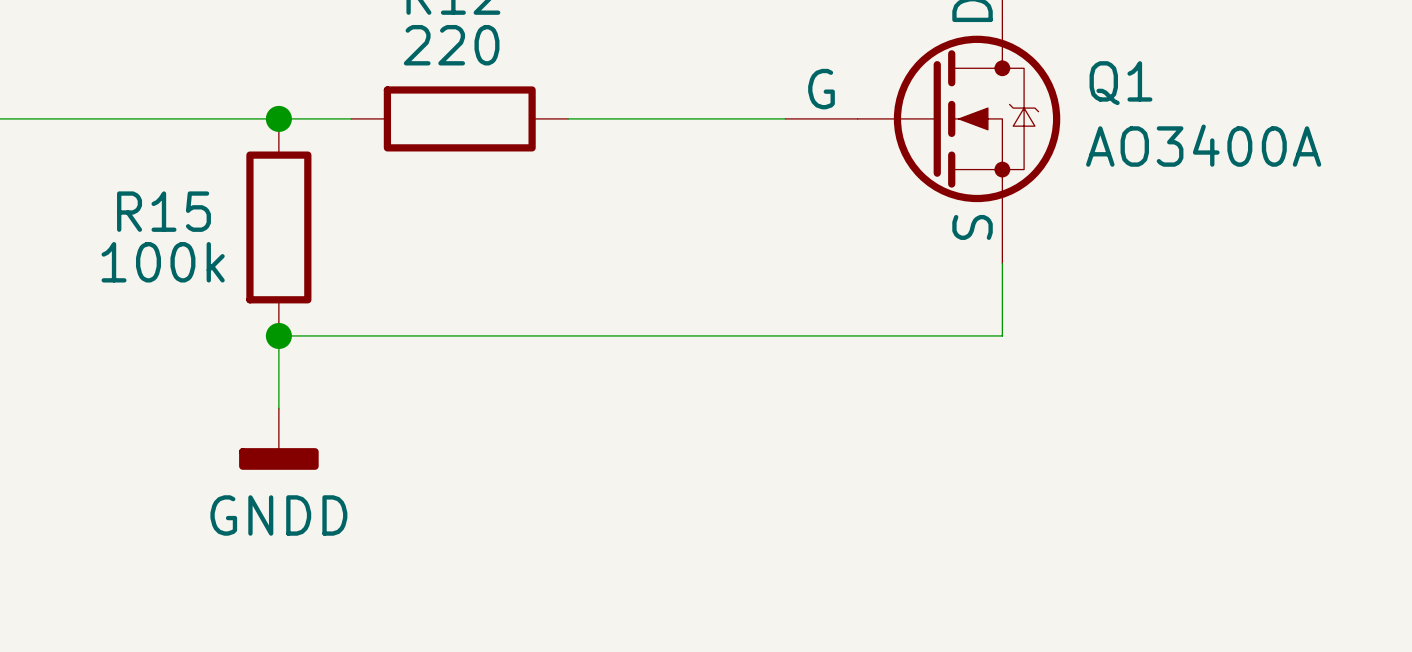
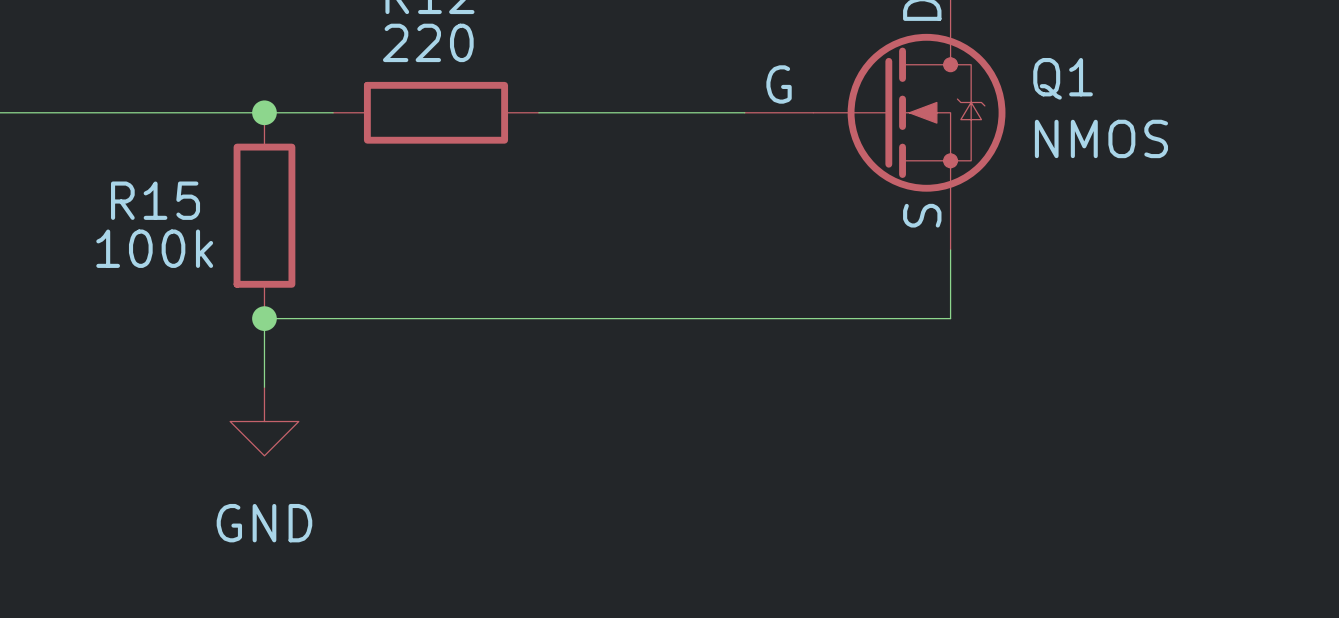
Q1 value: AO3400A (1203, 145) -> NMOS (1101, 138)
power symbol: GNDD (278, 439) -> GND (264, 421)

